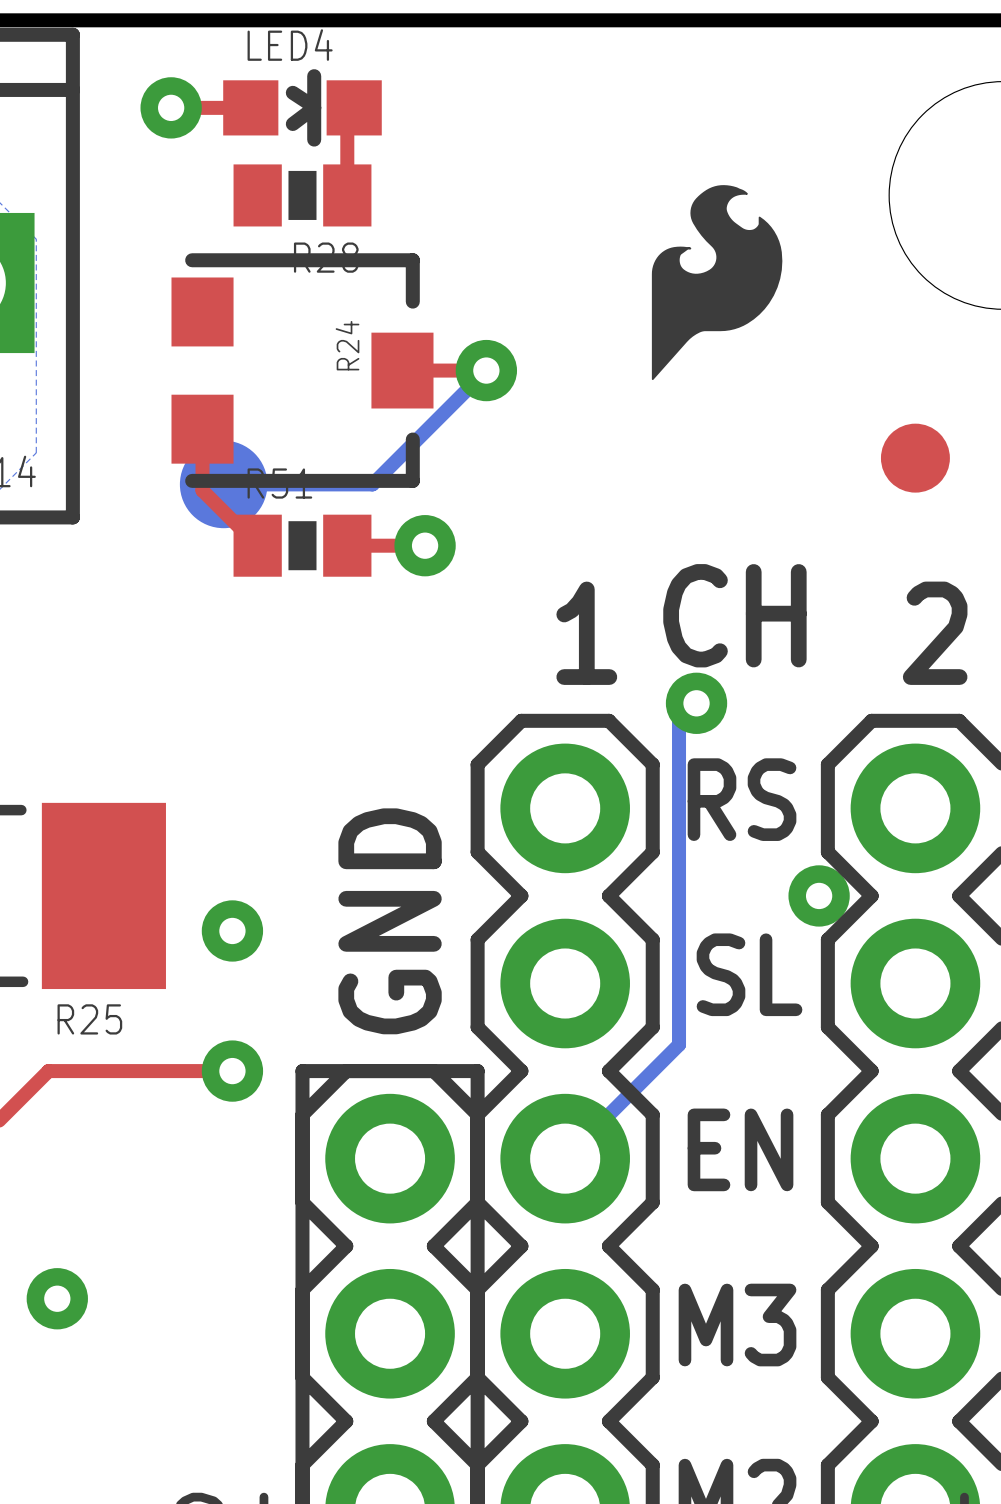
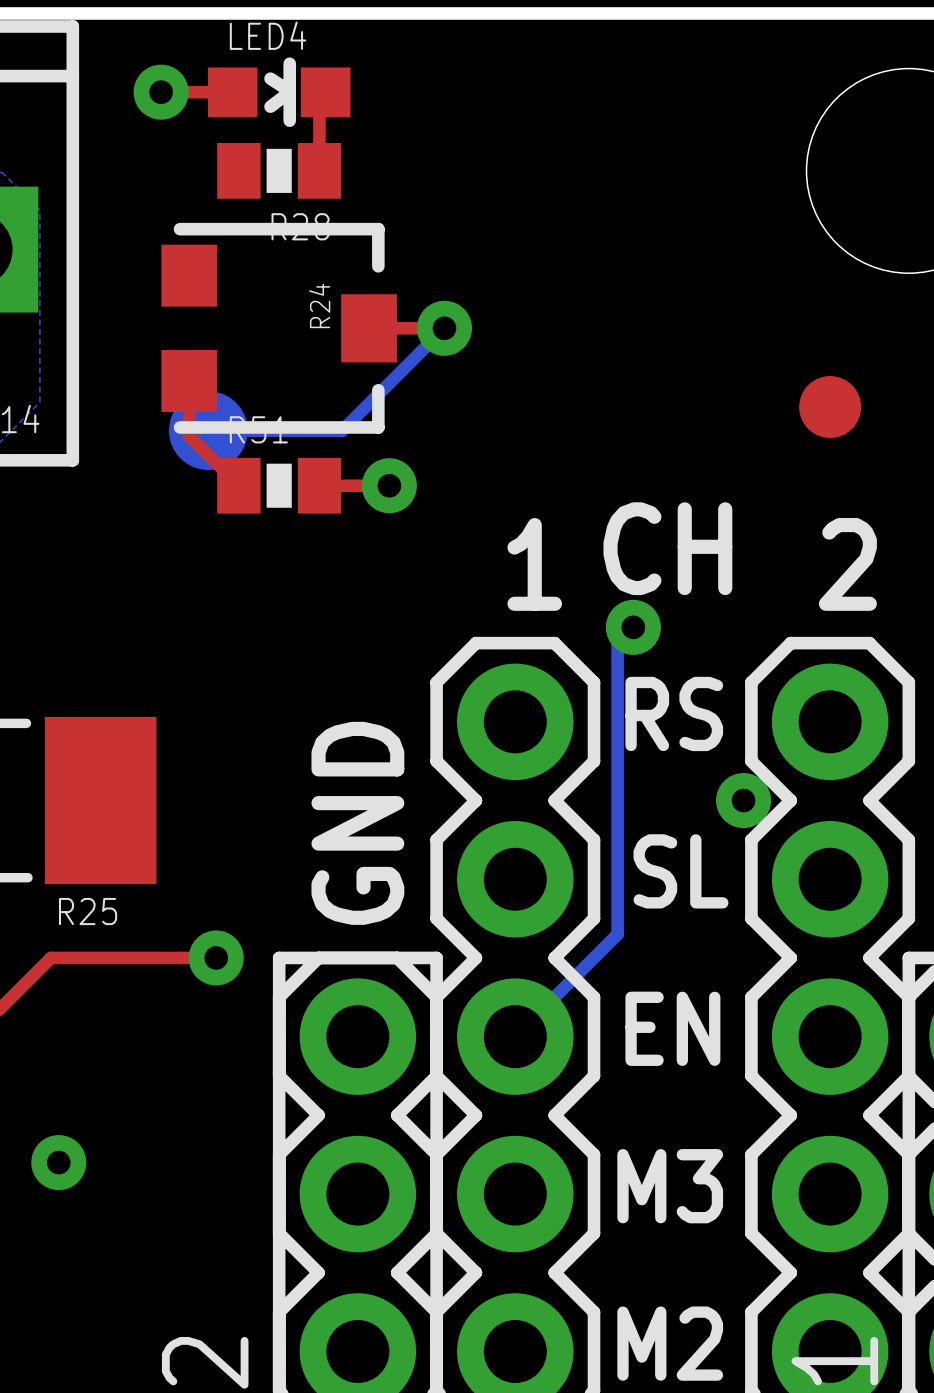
drawing: [651, 185, 783, 381] -> none
via: (232, 930) -> none

